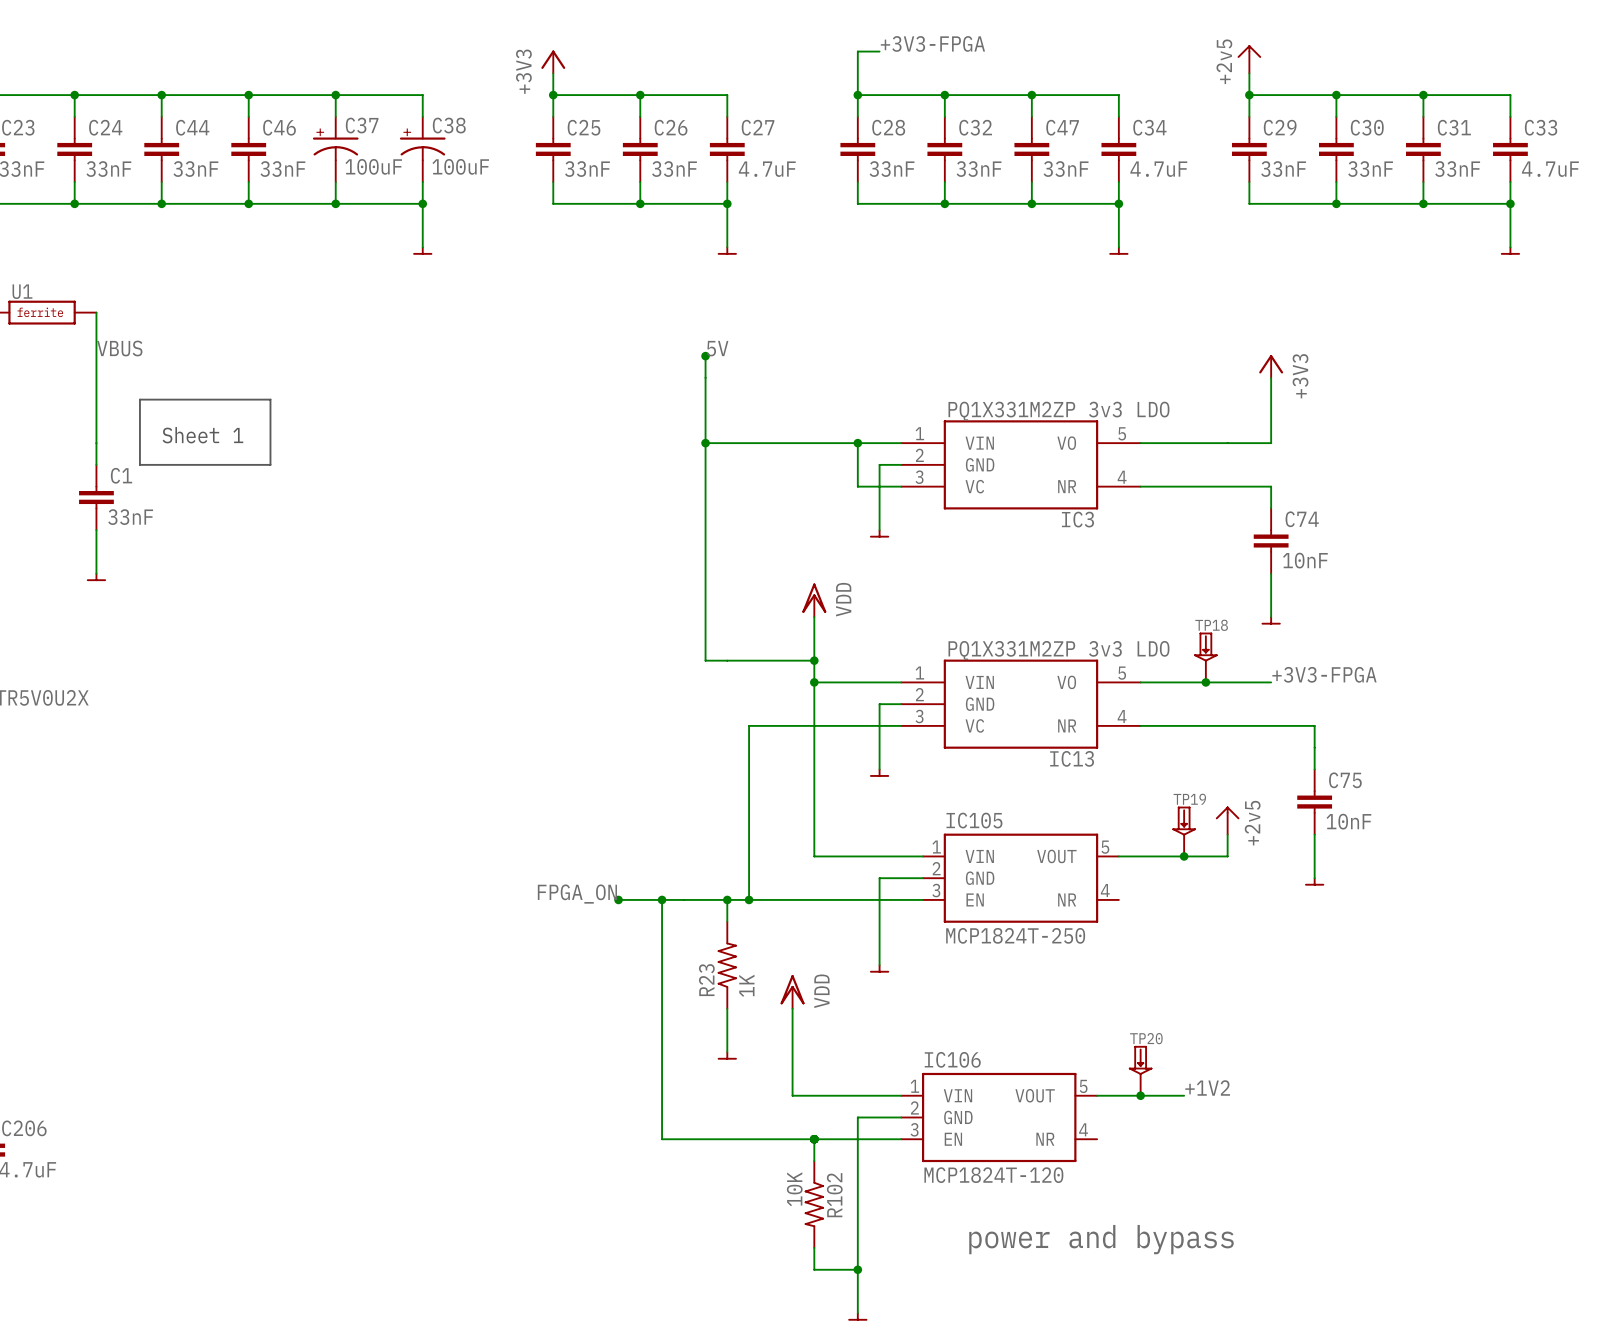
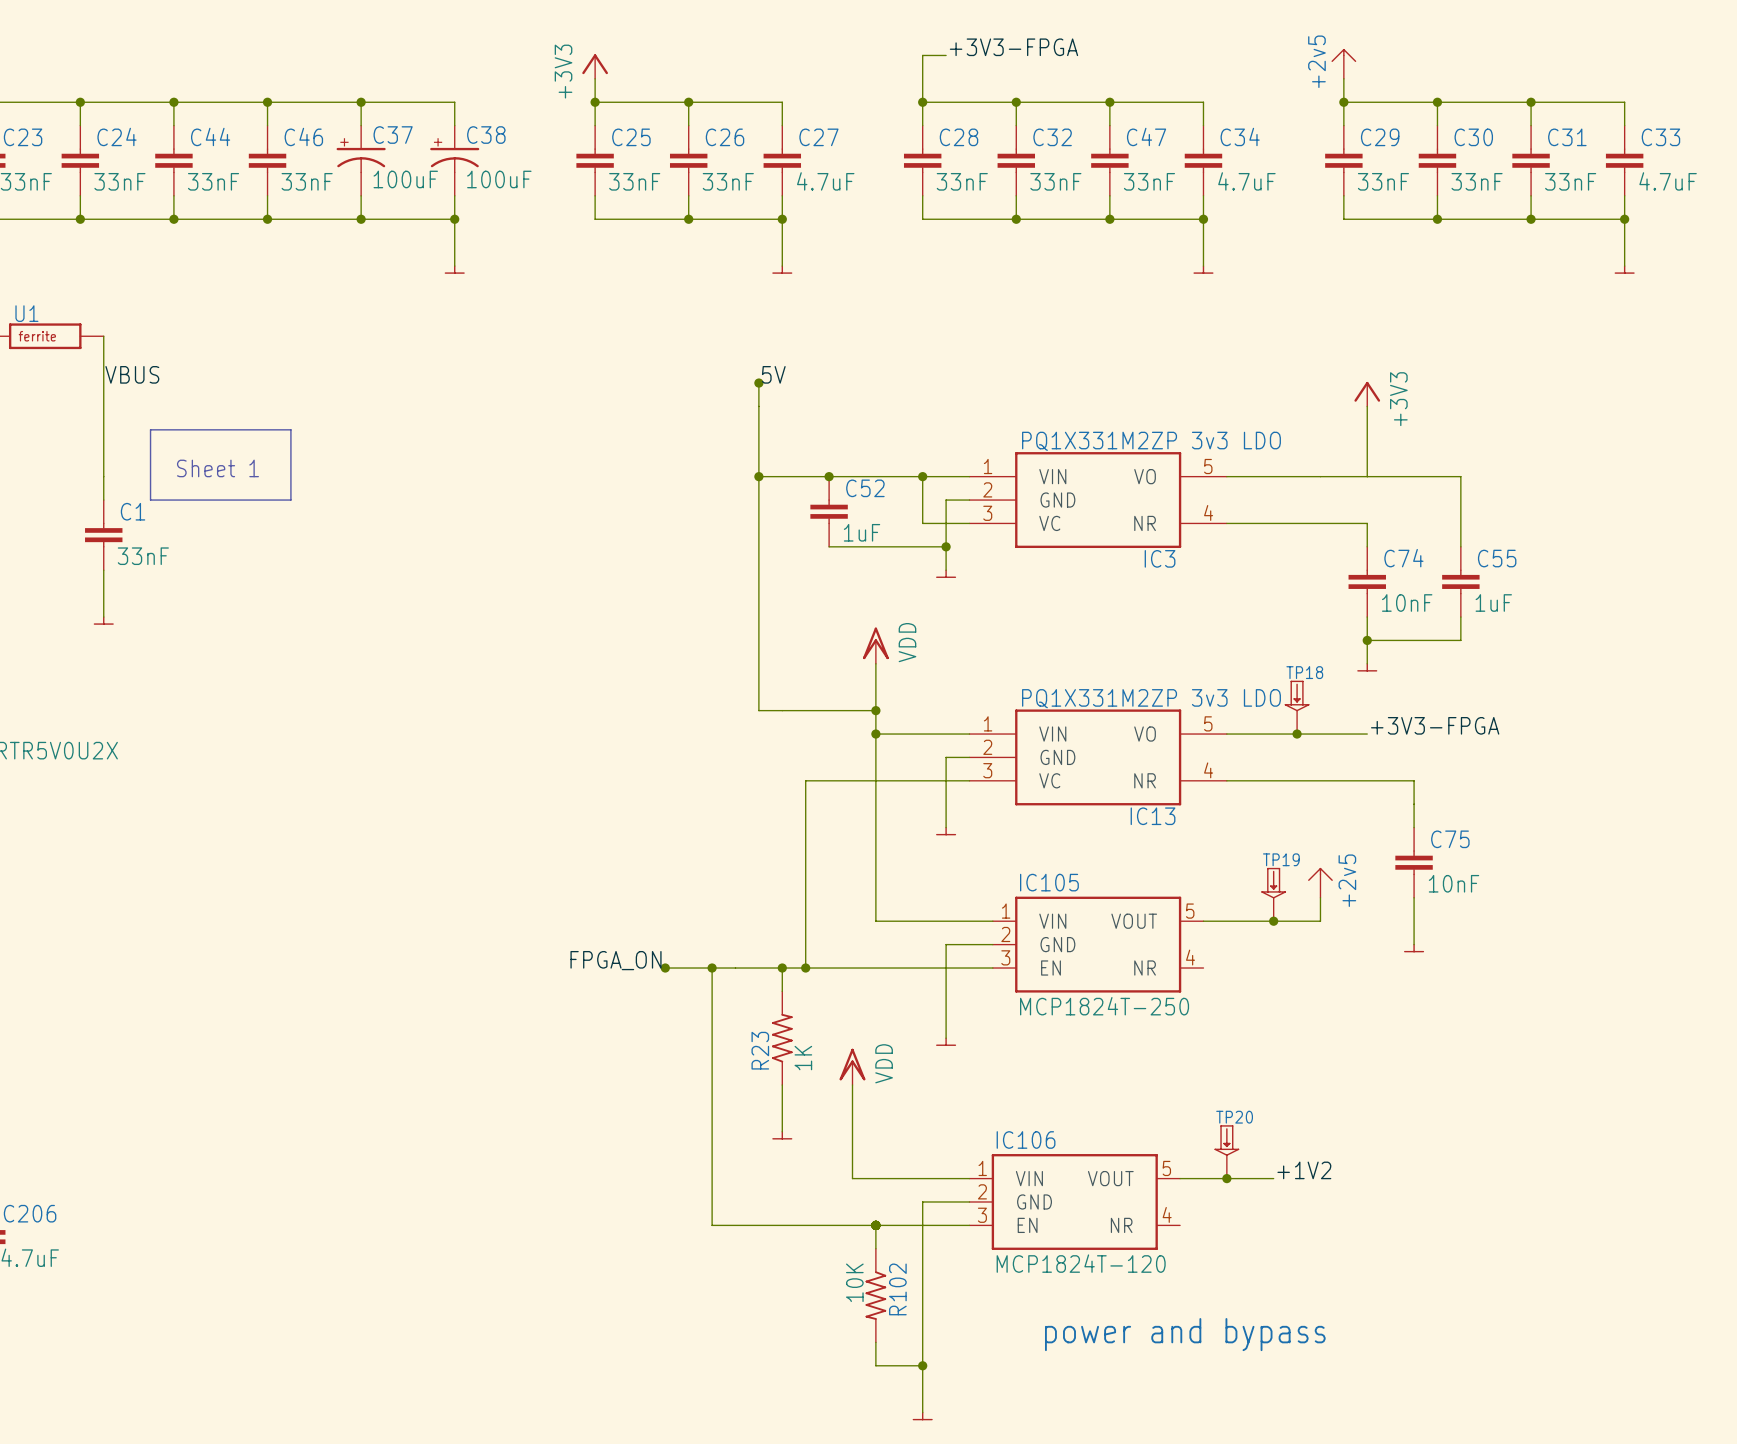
junction: none -> (829, 476)
wire: none -> (1367, 476) (1460, 476) (1460, 546)
C52: none -> 1uF (829, 511)
wire: none -> (829, 546) (946, 546)
junction: none -> (946, 546)
C55: none -> 1uF (1460, 581)
wire: none -> (1460, 617) (1460, 640) (1367, 640)
junction: none -> (1367, 640)

